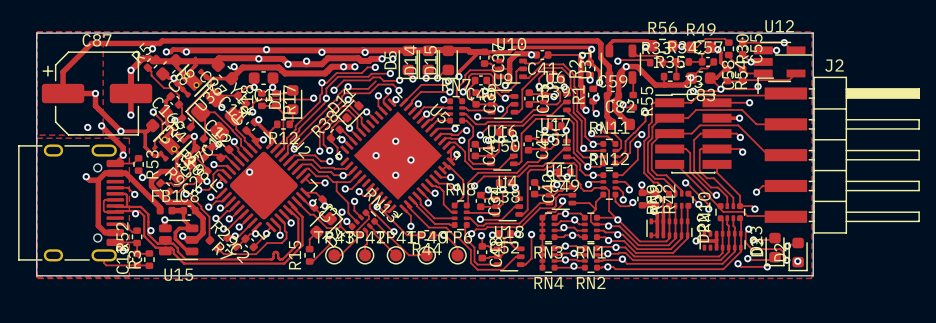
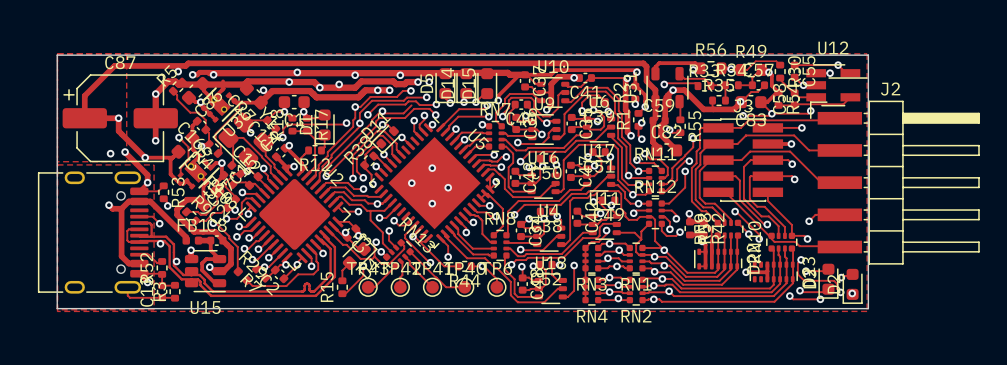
via: (249, 172) -> none

